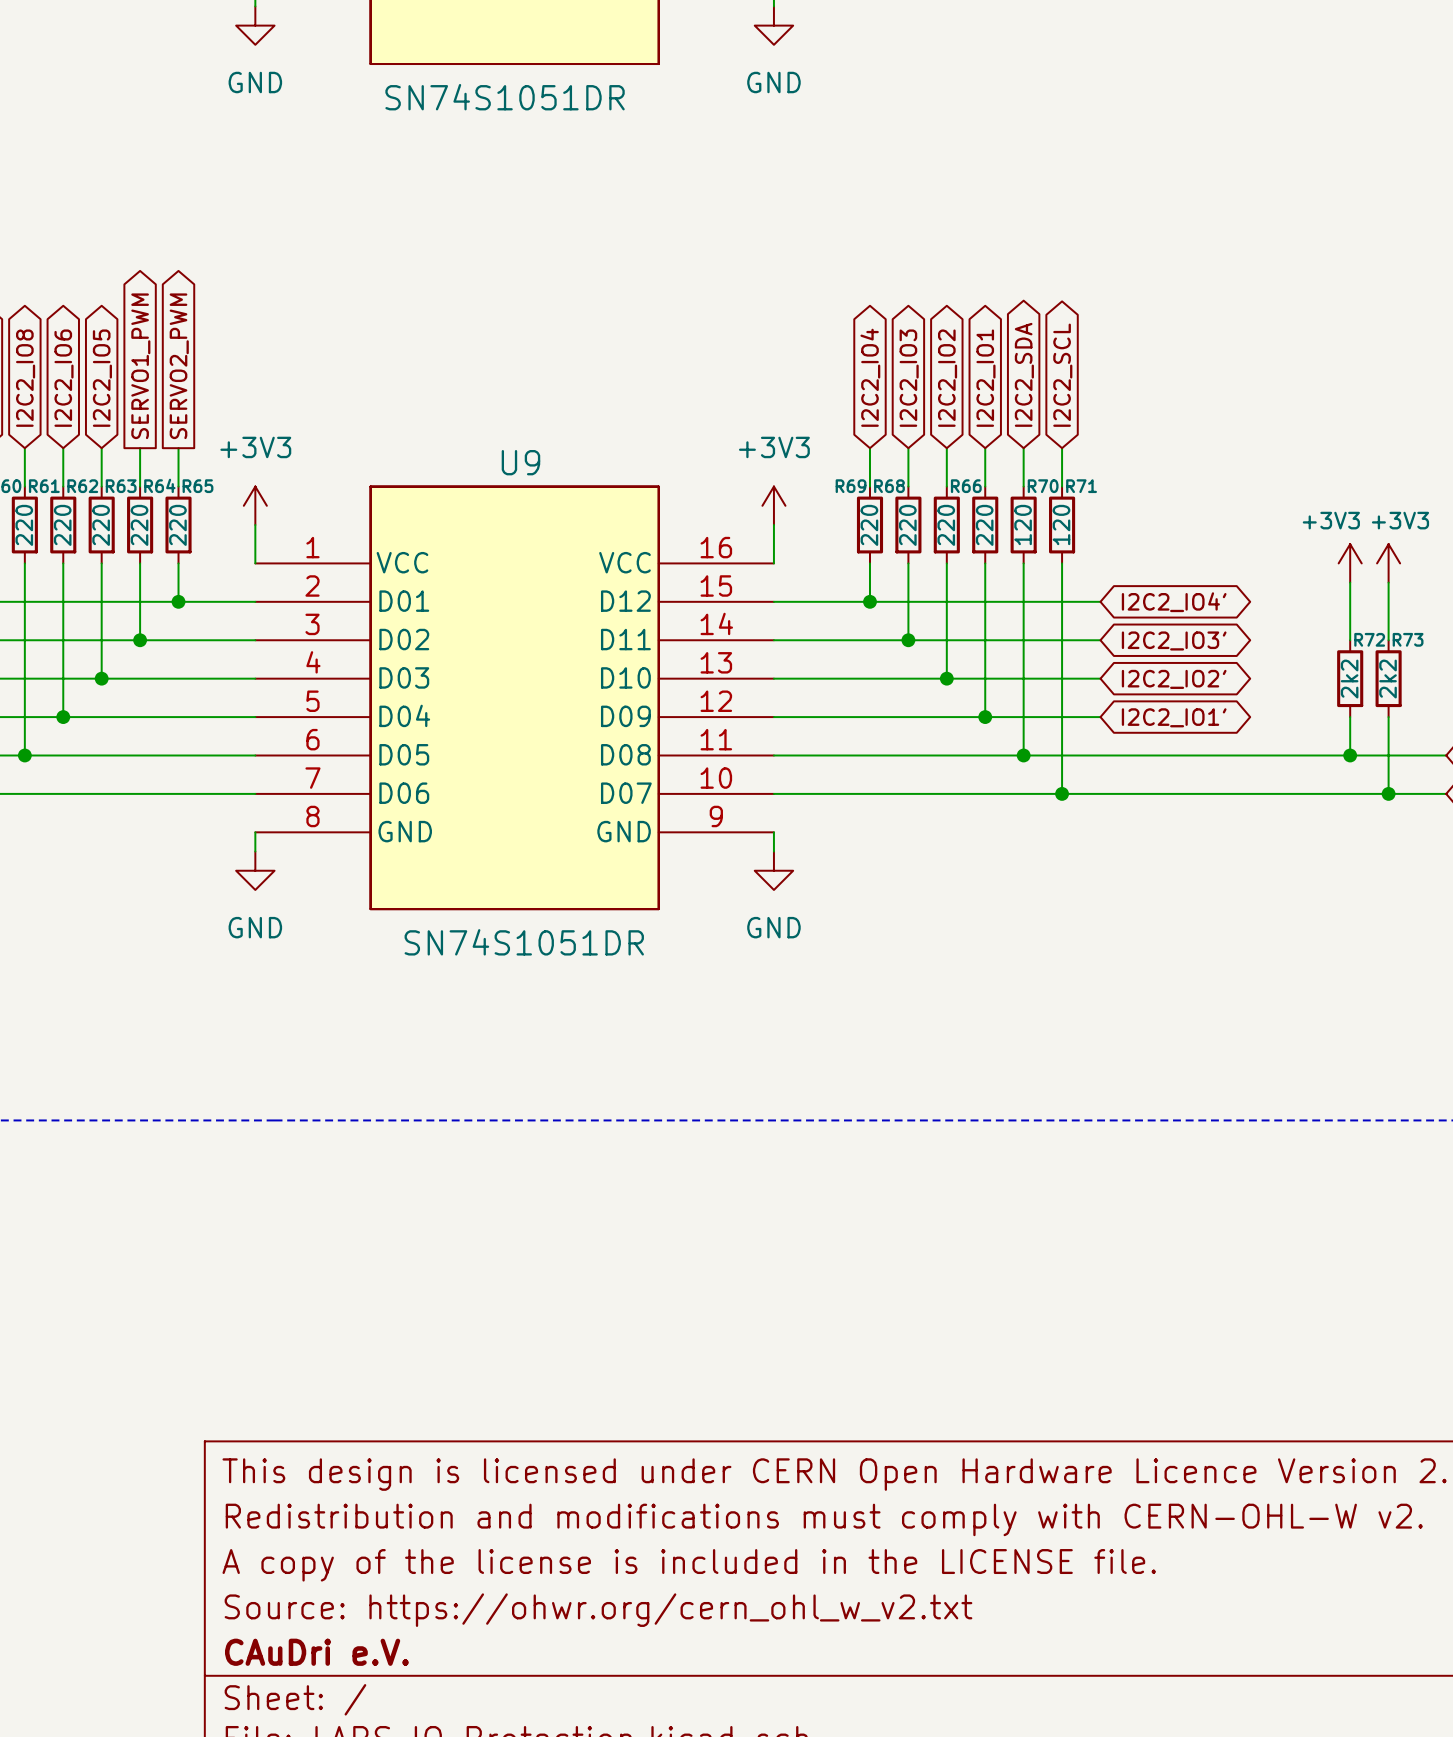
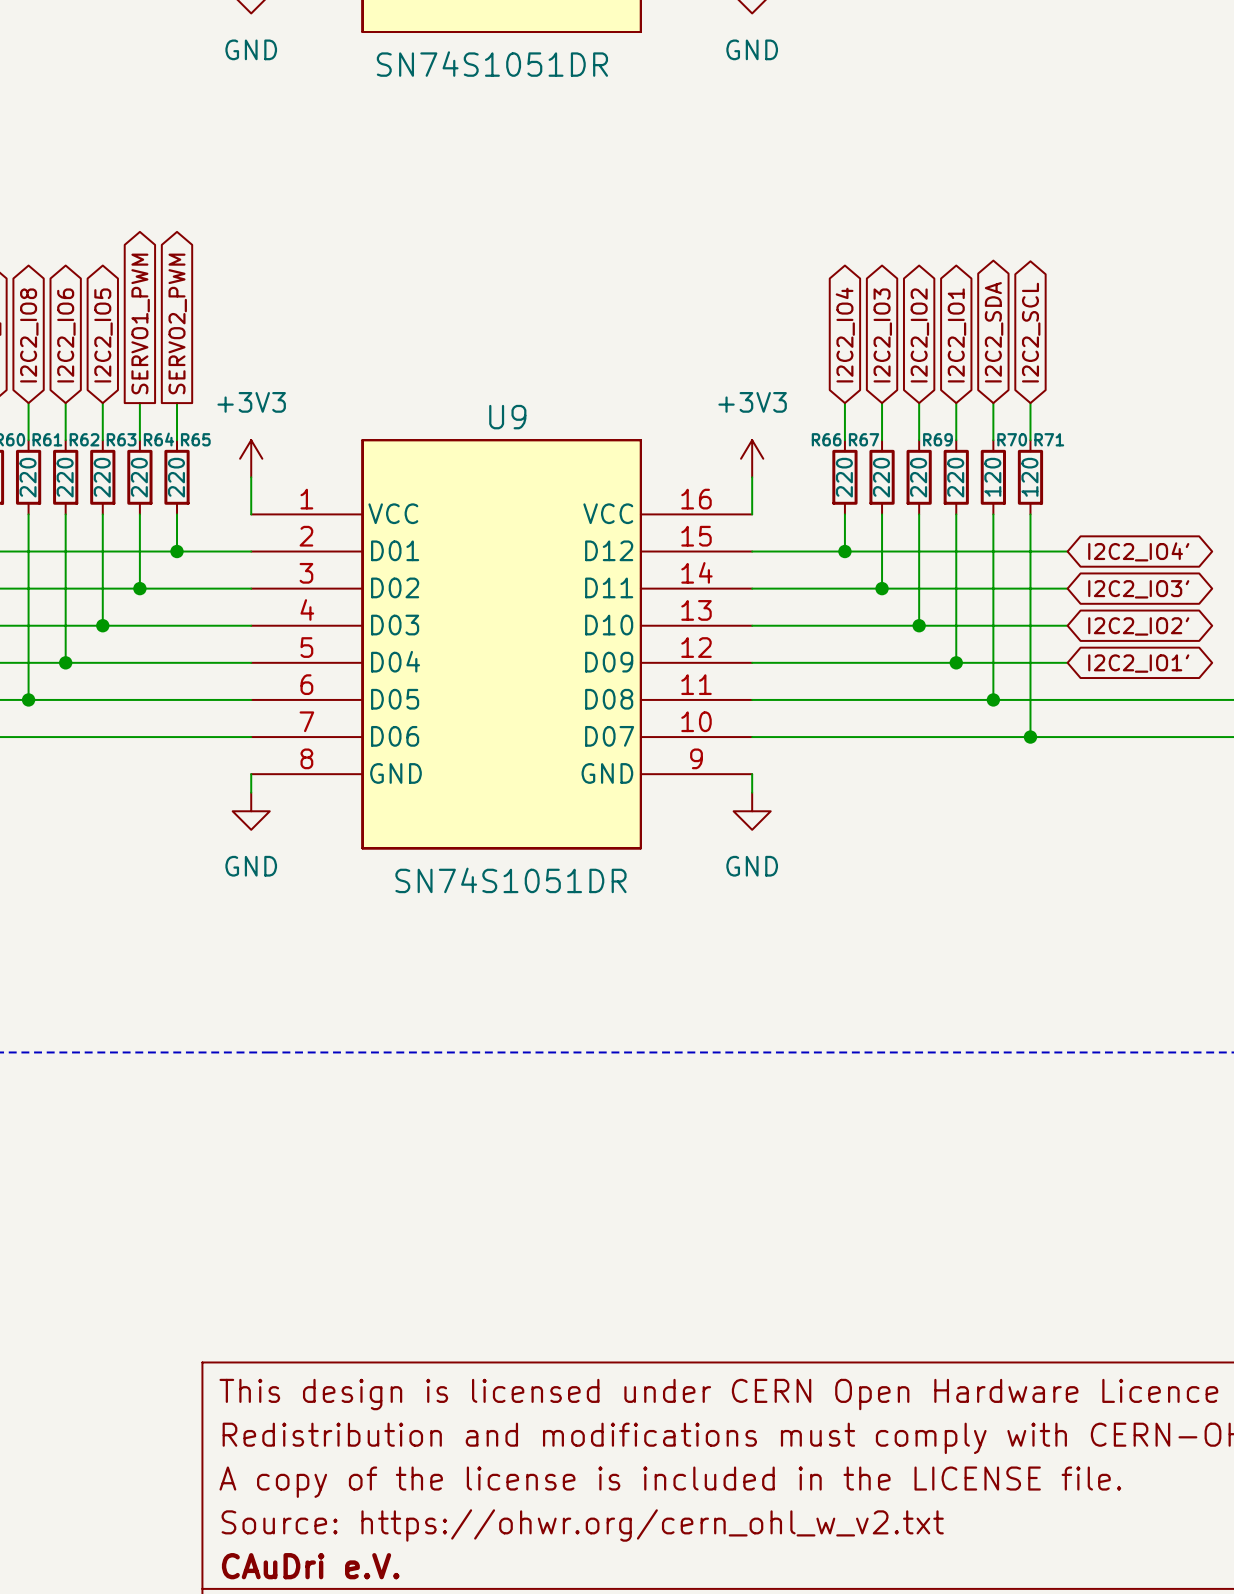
R69 name: R69 (851, 486) -> R66 (826, 439)
R68 name: R68 (889, 486) -> R67 (864, 439)
R66 name: R66 (966, 486) -> R69 (937, 439)

